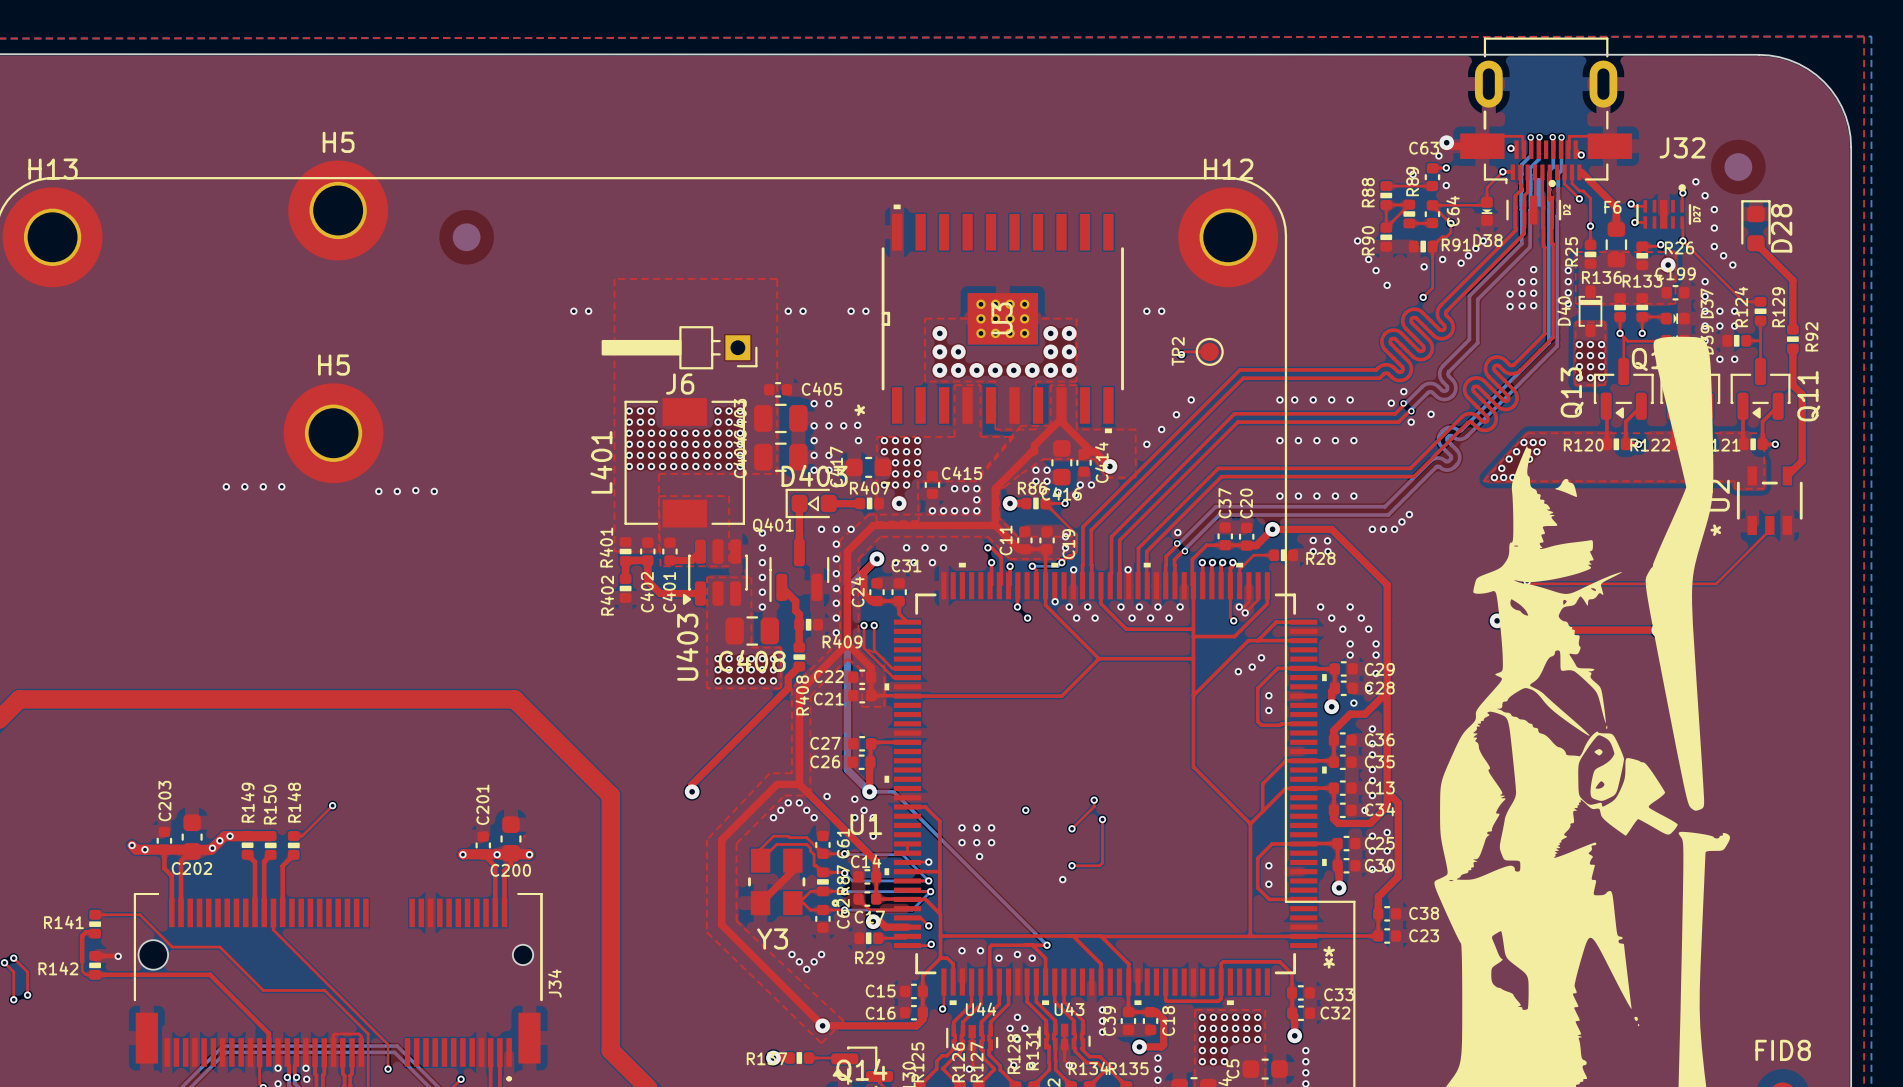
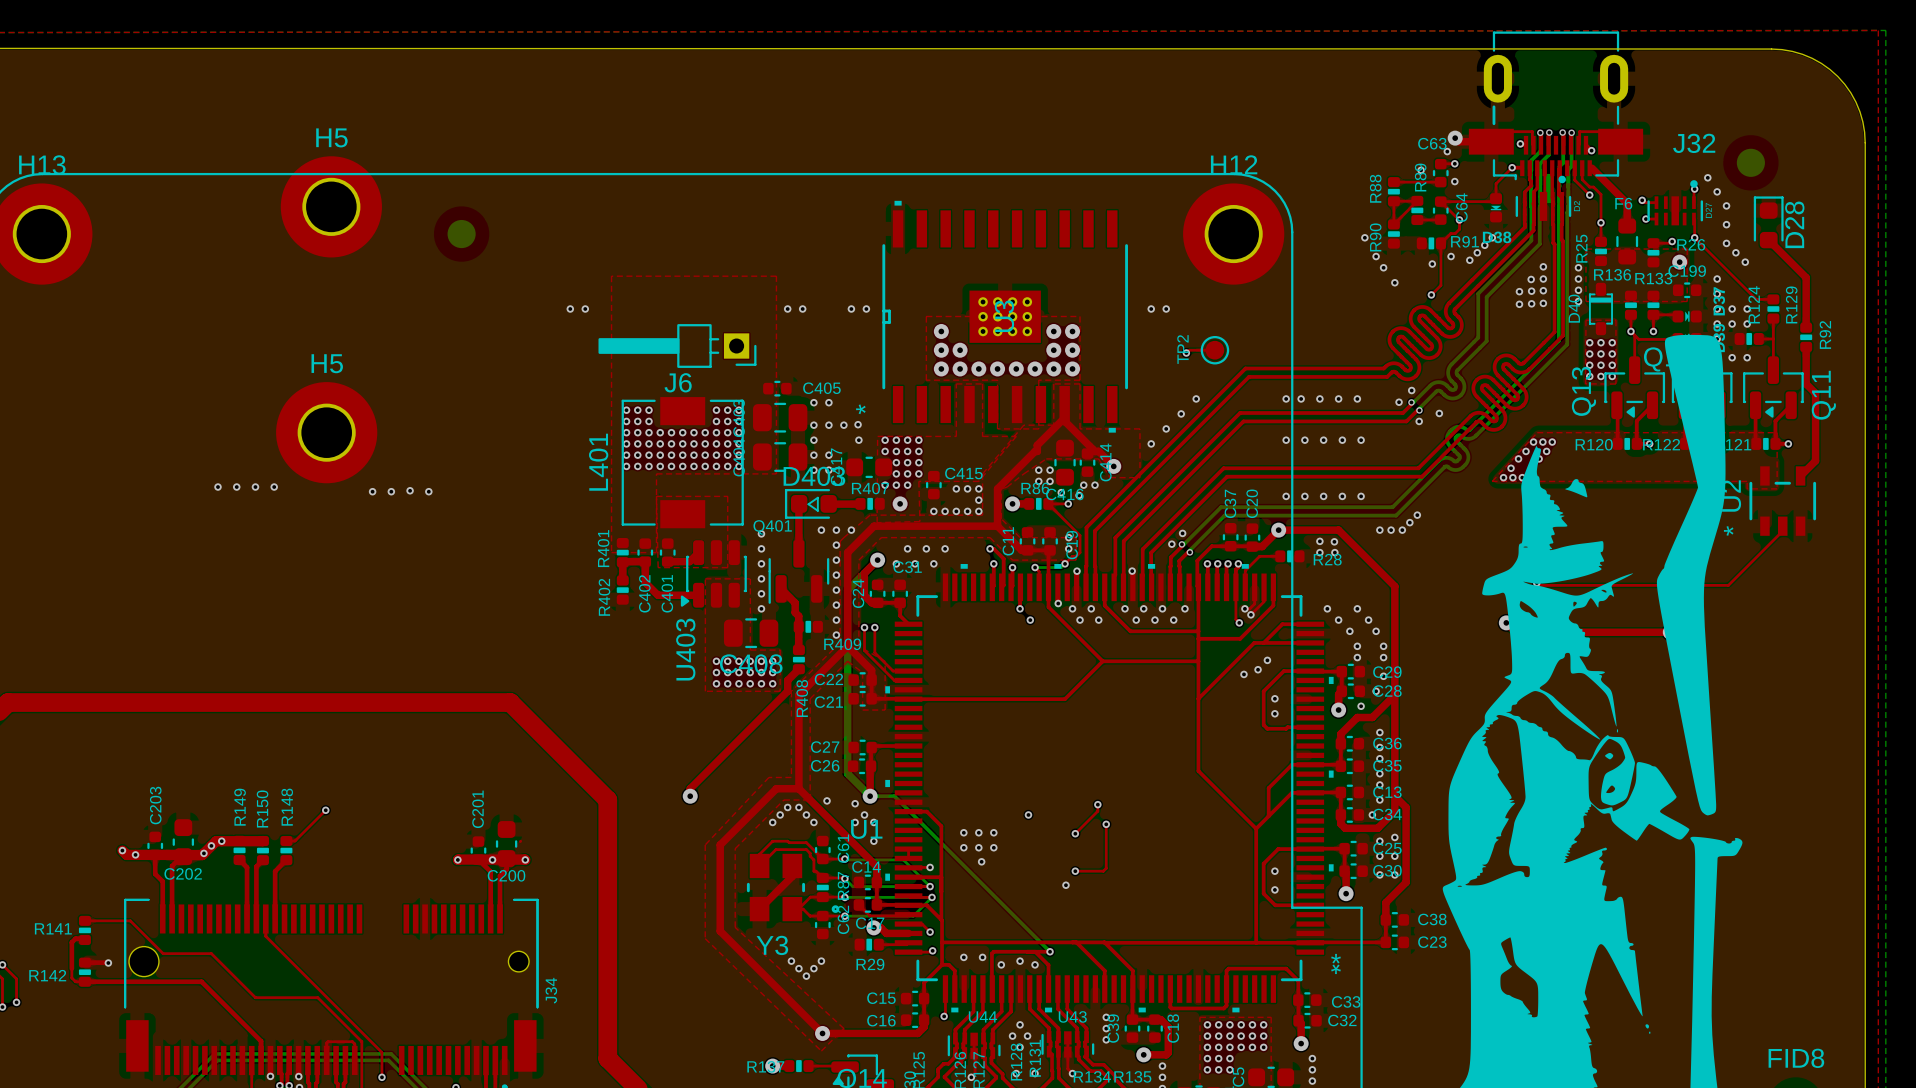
via: none -> (1171, 544)

